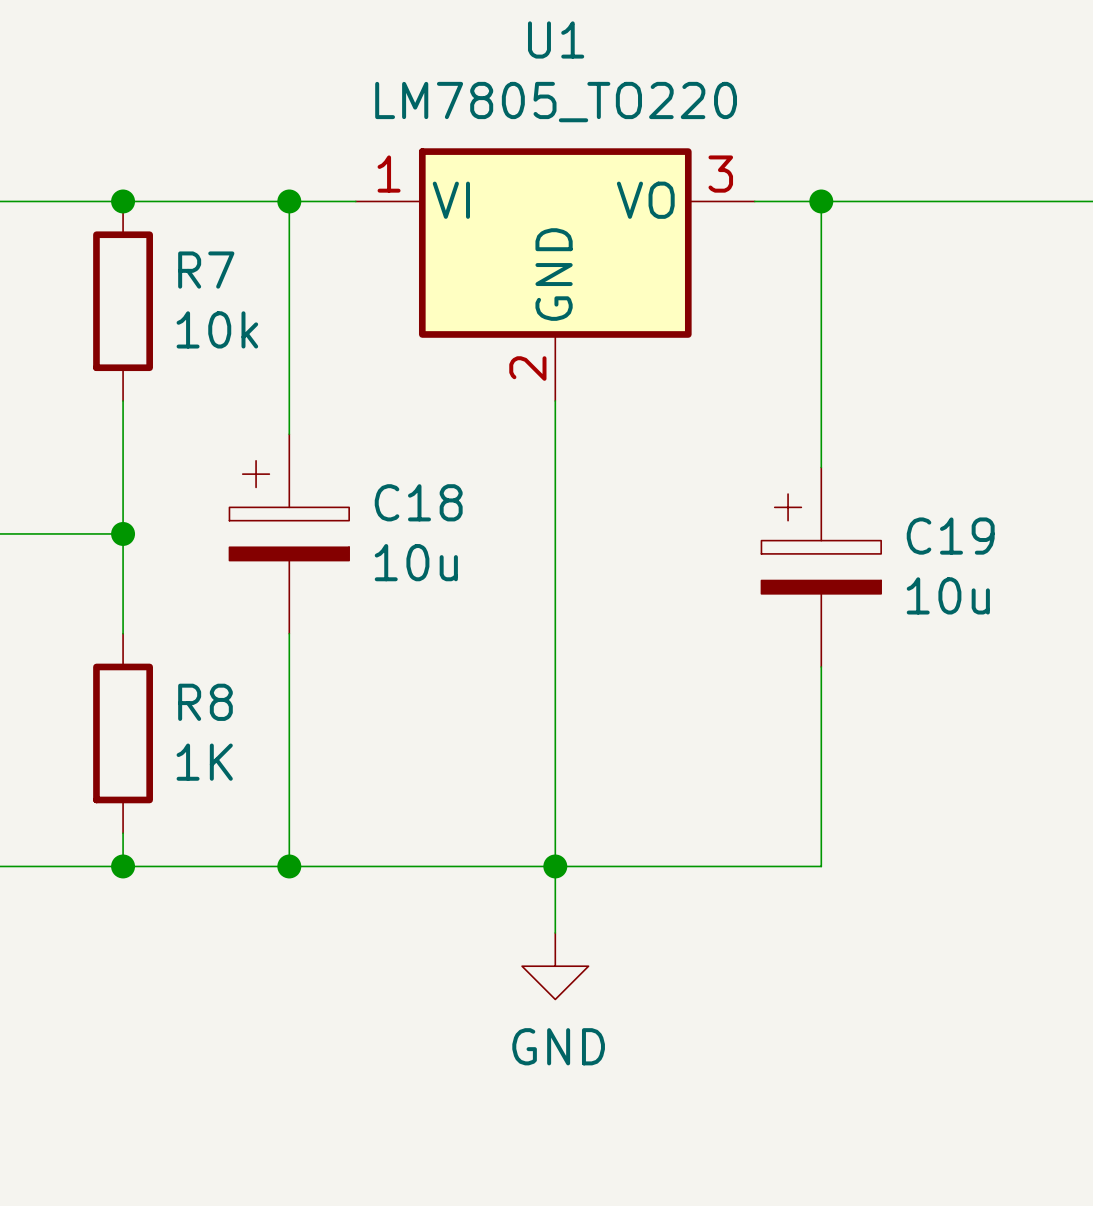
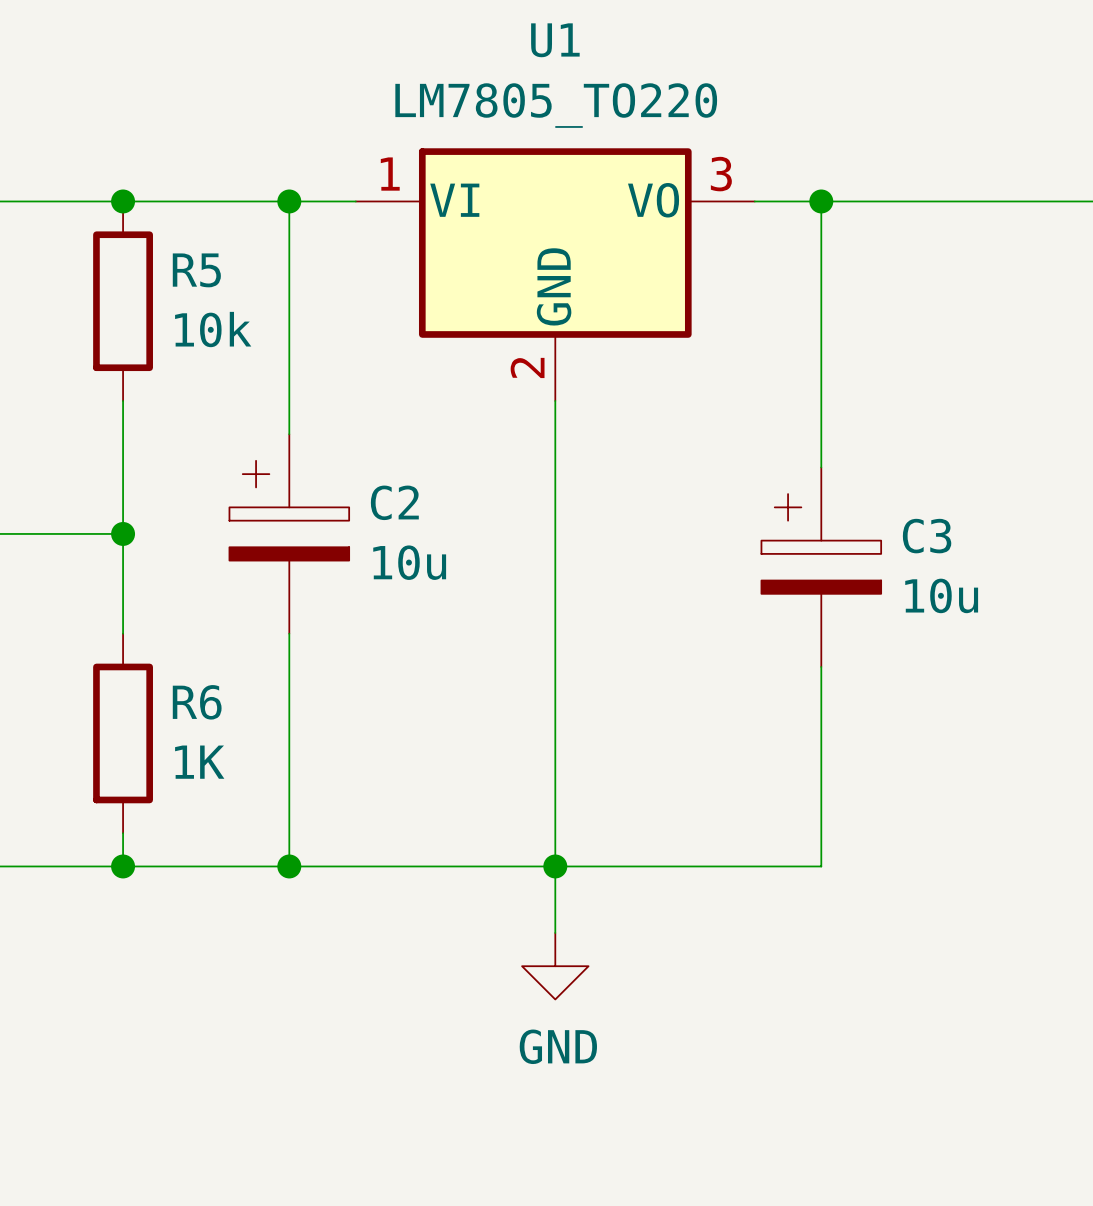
R7 name: R7 (206, 270) -> R5 (196, 270)
C18 name: C18 (418, 502) -> C2 (394, 502)
C19 name: C19 (950, 536) -> C3 (927, 536)
R8 name: R8 (205, 702) -> R6 (197, 702)

